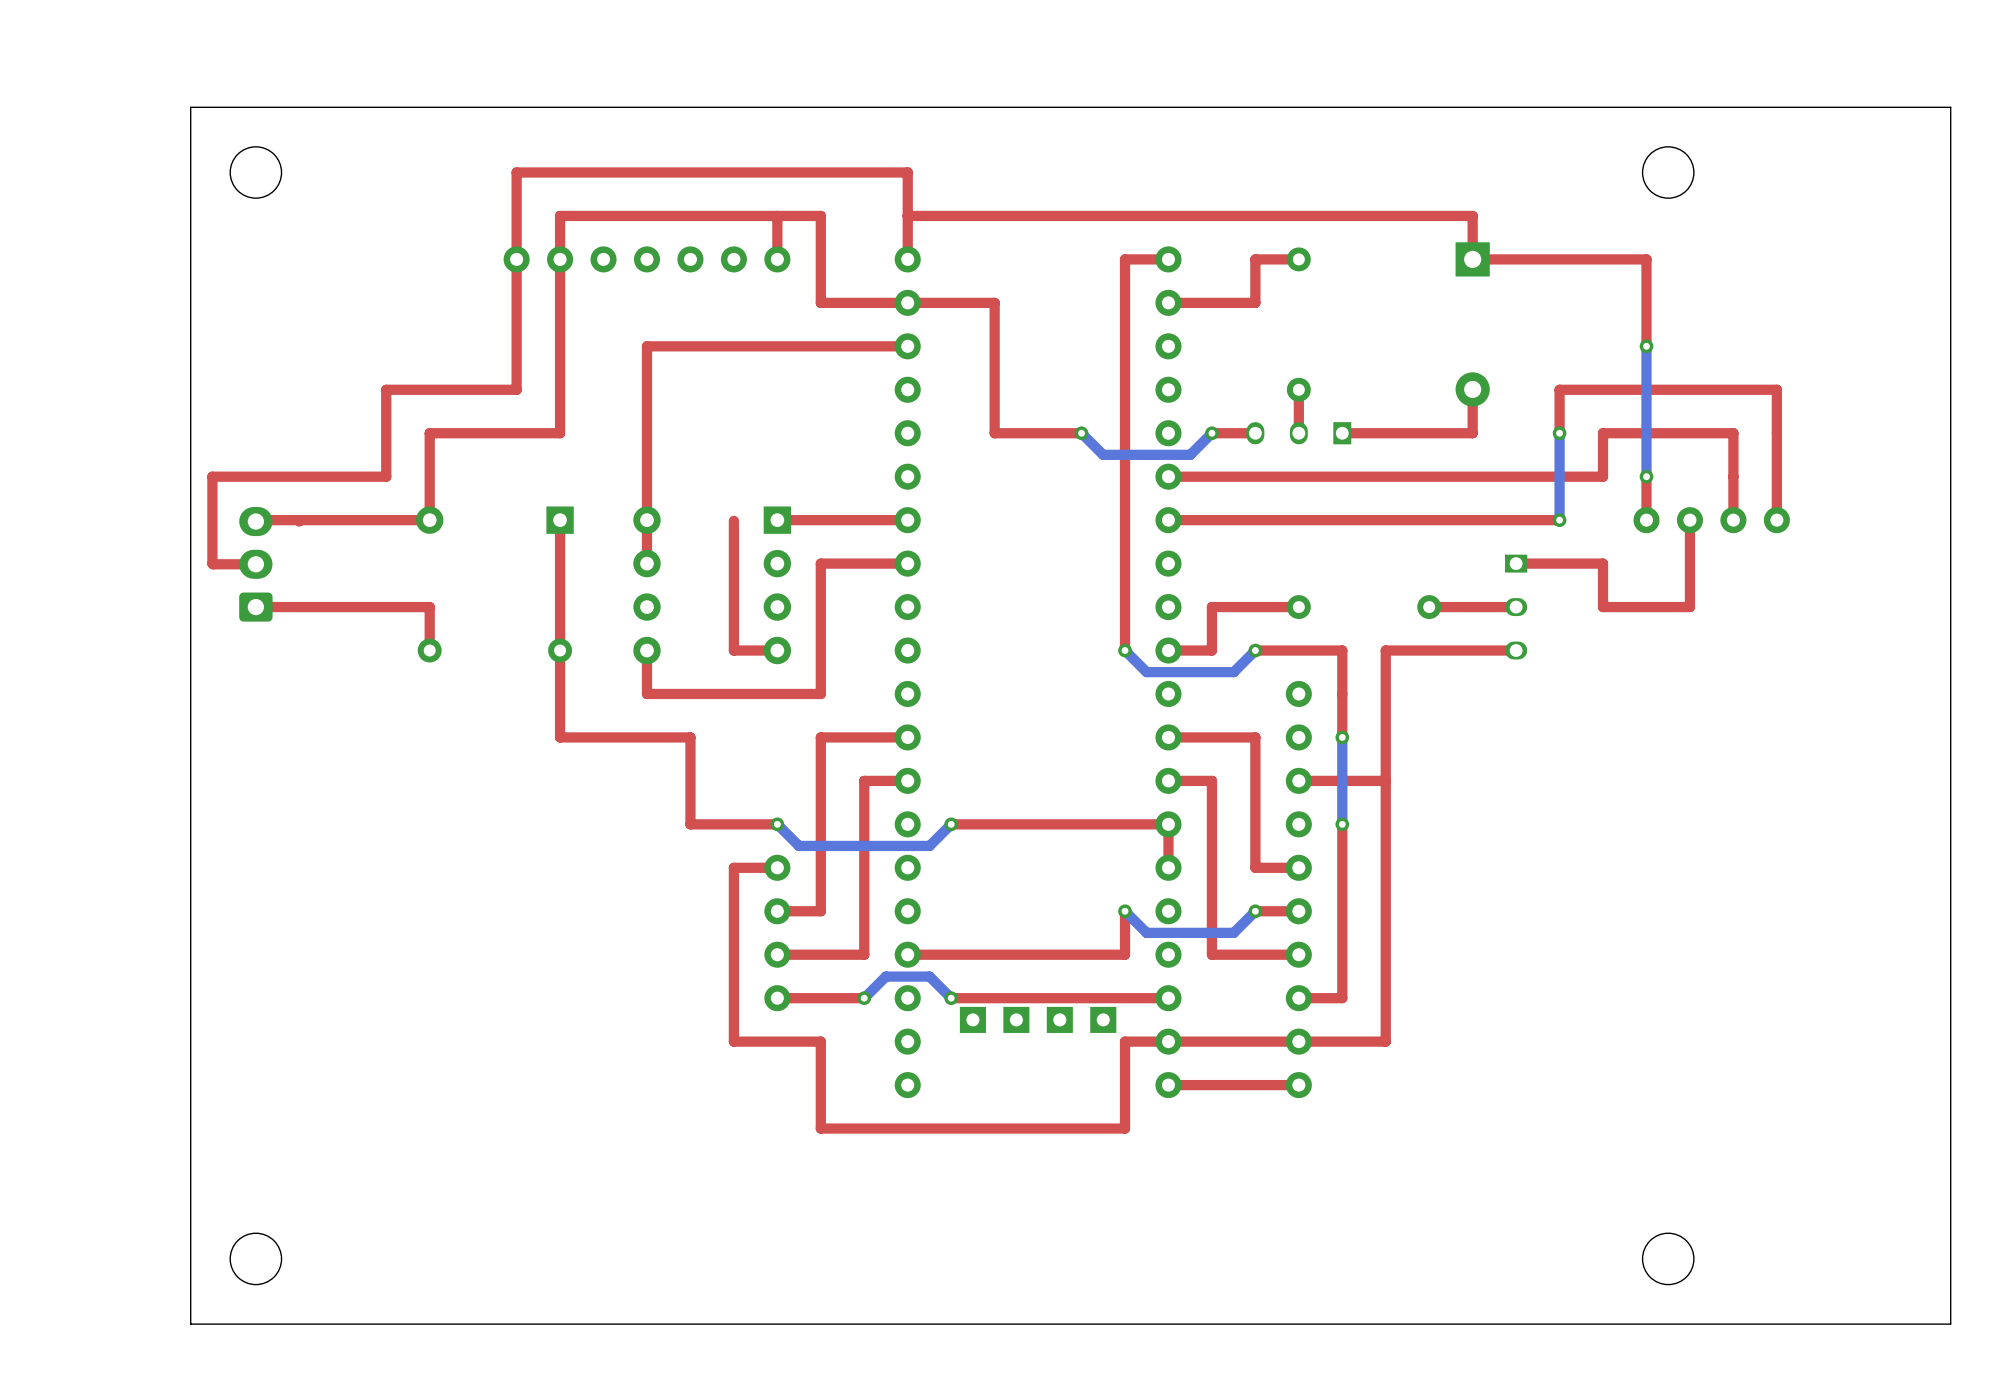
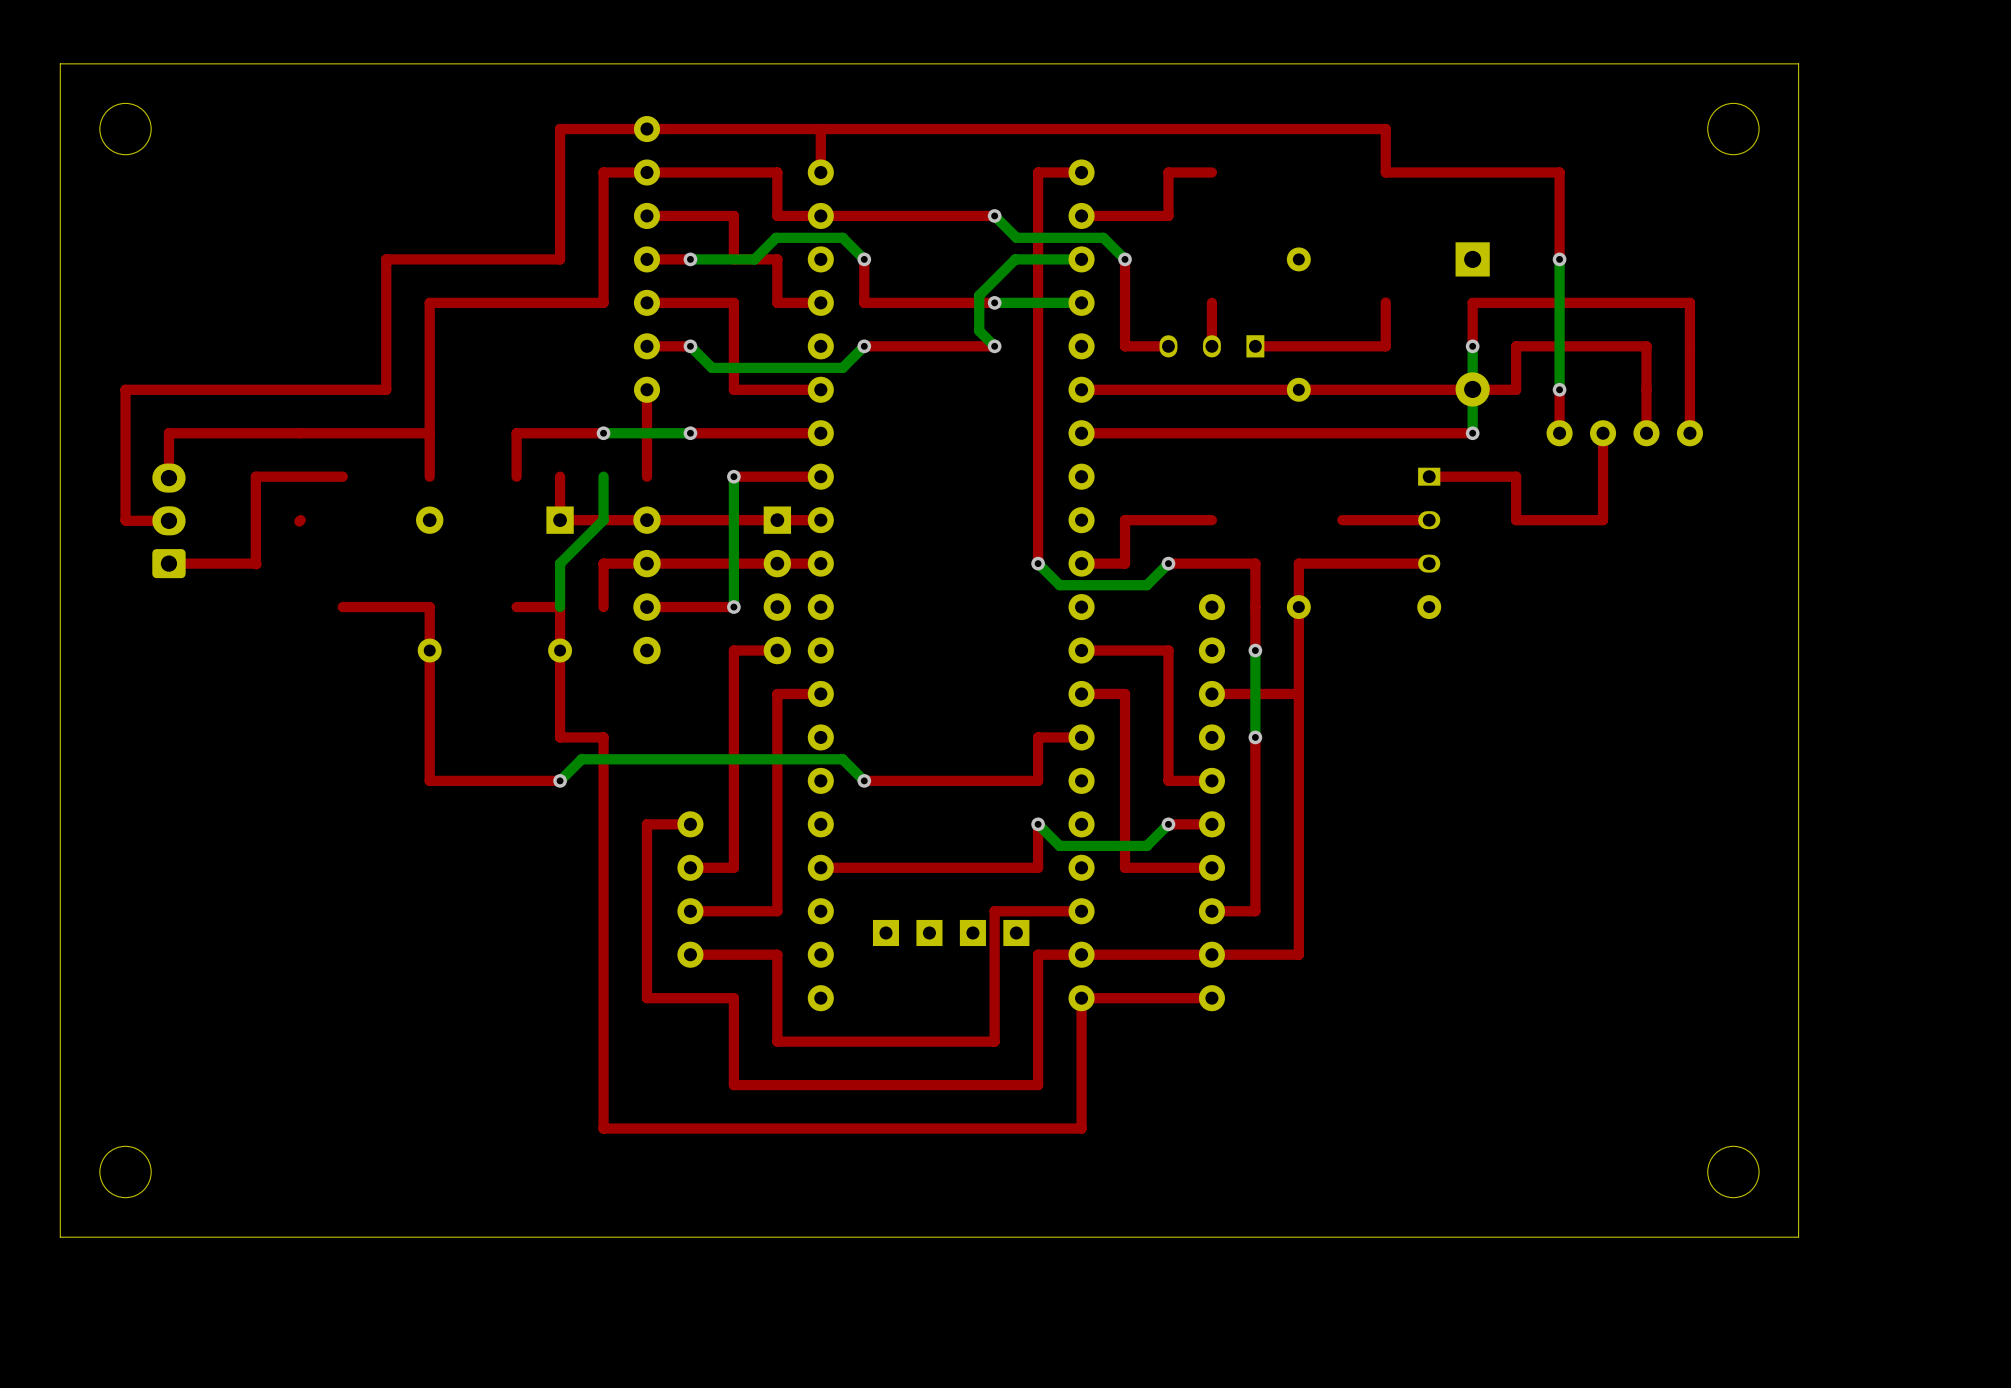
board edge: (1950, 107) (1950, 1324) (190, 1324) (190, 107) (1950, 107) -> (1798, 63) (1798, 1237) (60, 1237) (60, 63) (1798, 63)
round board edge position: (255, 172) -> (125, 129)
top track: (603, 172) (516, 172) (516, 389) (386, 389) (386, 476) (342, 476) -> (603, 172) (603, 302) (429, 302) (429, 433) (168, 433) (168, 478)
top track: (777, 172) (907, 172) (907, 259) -> (777, 172) (777, 215)
top track: none -> (1081, 172) (1038, 172) (1038, 563)
round board edge position: (1668, 172) -> (1733, 129)
top track: (646, 215) (560, 215) -> (1559, 259) (1559, 172) (1385, 172) (1385, 129) (560, 129) (560, 215)
top track: (733, 215) (777, 215) (777, 259) -> (733, 215) (733, 259) (777, 259) (777, 302) (820, 302)
top track: (820, 215) (820, 302) (864, 302) -> (864, 259) (864, 302)
top track: none -> (907, 215) (820, 215)
bottom track: none -> (994, 215) (1016, 237) (1103, 237) (1125, 259)
via: none -> (994, 215)
top track: (1081, 215) (994, 215) -> (994, 346) (907, 346)
top track: (1168, 215) (1472, 215) (1472, 259) (1646, 259) (1646, 346) -> (1168, 215) (1168, 172) (1211, 172)
top track: (560, 259) (560, 433) -> (603, 433) (560, 433)
top track: none -> (560, 259) (386, 259) (386, 389) (125, 389) (125, 520) (168, 520)
part rotation: 0° (646, 259) -> 90° clockwise (646, 259)
top track: none -> (690, 259) (646, 259)
via: none -> (690, 259)
bottom track: none -> (864, 259) (842, 237) (776, 237) (754, 259) (690, 259)
via: none -> (864, 259)
bottom track: none -> (1081, 259) (1015, 259) (979, 295) (979, 330) (994, 346)
via: none -> (1125, 259)
top track: (1168, 259) (1125, 259) -> (1168, 520) (1125, 520)
top track: (1298, 259) (1255, 259) (1255, 302) (1168, 302) -> none
via: none -> (1559, 259)
top track: none -> (646, 302) (733, 302) (733, 389) (820, 389)
top track: (994, 302) (994, 433) (1081, 433) -> (1211, 433) (1081, 433)
via: none -> (994, 302)
bottom track: none -> (1081, 302) (994, 302)
top track: none -> (1385, 302) (1385, 346) (1255, 346)
top track: (646, 346) (646, 389) -> (820, 129) (820, 172)
via: none -> (690, 346)
top track: (864, 346) (690, 346) -> none
bottom track: none -> (864, 346) (842, 367) (712, 367) (690, 346)
via: none -> (864, 346)
via: none -> (994, 346)
top track: (1125, 346) (1125, 520) -> (1125, 346) (1168, 346)
part: none -> (1211, 346)
top track: none -> (1472, 346) (1472, 302) (1689, 302) (1689, 433)
via: none -> (1472, 346)
bottom track: (1646, 346) (1646, 476) -> (1559, 259) (1559, 389)
via: (1646, 346) -> none
top track: none -> (1081, 389) (1516, 389) (1516, 346) (1646, 346) (1646, 433)
top track: (1298, 389) (1298, 433) -> (1211, 302) (1211, 346)
top track: (1472, 389) (1472, 433) -> none
top track: (1559, 389) (1776, 389) (1776, 520) -> none
via: none -> (1559, 389)
top track: (516, 433) (429, 433) -> (516, 433) (516, 476)
via: none -> (603, 433)
bottom track: none -> (690, 433) (603, 433)
via: none -> (690, 433)
top track: none -> (820, 433) (690, 433)
via: (1081, 433) -> none
bottom track: (1211, 433) (1190, 454) (1103, 454) (1081, 433) -> (1168, 563) (1146, 585) (1059, 585) (1038, 563)
via: (1211, 433) -> none
part: (1298, 433) -> none
via: none -> (1472, 433)
bottom track: (1559, 433) (1559, 520) -> (1472, 346) (1472, 433)
via: (1559, 433) -> none
top track: (1603, 433) (1733, 433) (1733, 520) -> none
top track: (255, 476) (212, 476) (212, 563) (255, 564) -> (255, 476) (255, 563) (168, 563)
top track: (429, 476) (429, 520) (255, 521) -> none
top track: none -> (560, 476) (560, 520) (777, 520)
bottom track: none -> (603, 476) (603, 520) (560, 563) (560, 607)
top track: (646, 476) (646, 563) -> none
bottom track: none -> (733, 476) (733, 607)
via: none -> (733, 476)
top track: (1429, 476) (1168, 476) -> none
top track: (1603, 476) (1516, 476) -> (1603, 476) (1603, 520) (1559, 520)
top track: (1646, 476) (1646, 520) -> none
via: (1646, 476) -> none
top track: (560, 520) (560, 607) -> (516, 607) (560, 607)
top track: (733, 520) (733, 650) -> (690, 867) (733, 867) (733, 650)
top track: (907, 520) (820, 520) -> (820, 476) (733, 476)
top track: (1342, 520) (1211, 520) -> none
part: none -> (1429, 520)
top track: (1516, 520) (1429, 520) -> (1516, 520) (1516, 476)
via: (1559, 520) -> none
top track: (1689, 520) (1689, 607) (1603, 607) (1603, 563) (1516, 563) -> none
part position: (1711, 520) -> (1624, 433)
top track: none -> (820, 563) (603, 563) (603, 607)
top track: (907, 563) (820, 563) (820, 693) -> none
via: none -> (1038, 563)
top track: (1125, 563) (1125, 650) -> (1125, 563) (1081, 563)
via: none -> (1168, 563)
top track: none -> (1429, 563) (1298, 563) (1298, 954)
part position: (255, 564) -> (168, 520)
top track: (342, 607) (255, 607) -> none
via: none -> (733, 607)
top track: (1298, 607) (1211, 607) (1211, 650) (1168, 650) -> none
top track: (1516, 607) (1429, 607) -> (1342, 433) (1255, 433)
part: (1516, 607) -> none
top track: none -> (429, 650) (429, 780) (560, 780)
top track: (646, 650) (646, 693) (777, 693) -> (690, 911) (777, 911) (777, 693)
top track: none -> (1081, 650) (1168, 650) (1168, 780)
via: (1125, 650) -> none
top track: (1255, 650) (1342, 650) (1342, 737) -> (1255, 650) (1255, 563) (1168, 563)
bottom track: (1255, 650) (1233, 672) (1146, 672) (1125, 650) -> (1255, 650) (1255, 737)
top track: (1516, 650) (1385, 650) (1385, 1041) (1125, 1041) (1125, 1128) (1081, 1128) -> none
part position: (1038, 672) -> (951, 585)
top track: none -> (1081, 693) (1125, 693) (1125, 867) (1211, 867)
top track: (603, 737) (690, 737) (690, 824) (777, 824) -> (603, 737) (603, 1128) (820, 1128)
top track: (907, 737) (820, 737) (820, 911) (777, 911) -> none
top track: none -> (1081, 737) (1038, 737) (1038, 780) (907, 780)
top track: (1255, 737) (1168, 737) -> none
via: none -> (1255, 737)
bottom track: (1342, 737) (1342, 824) -> none
via: (1342, 737) -> none
via: none -> (560, 780)
top track: (864, 780) (864, 954) (777, 954) -> none
bottom track: none -> (864, 780) (842, 759) (581, 759) (560, 780)
via: none -> (864, 780)
top track: (1211, 780) (1211, 954) -> none
top track: (1385, 780) (1298, 780) -> (1298, 693) (1211, 693)
via: (777, 824) -> none
top track: (951, 824) (1168, 824) (1168, 867) -> none
bottom track: (951, 824) (929, 845) (798, 845) (777, 824) -> none
via: (951, 824) -> none
top track: none -> (1038, 824) (1038, 867) (820, 867)
via: none -> (1038, 824)
via: none -> (1168, 824)
top track: (1342, 824) (1342, 998) (1298, 998) -> none
via: (1342, 824) -> none
top track: (777, 867) (733, 867) (733, 998) -> (690, 824) (646, 824) (646, 998) (733, 998)
top track: (1298, 867) (1255, 867) -> (1211, 911) (1255, 911) (1255, 867)
part position: (1298, 889) -> (1211, 802)
top track: (1125, 911) (1125, 954) -> (1211, 954) (1125, 954)
via: (1125, 911) -> none
bottom track: (1255, 911) (1233, 932) (1146, 932) (1125, 911) -> (1168, 824) (1146, 845) (1059, 845) (1038, 824)
via: (1255, 911) -> none
top track: (1298, 911) (1255, 911) -> (1211, 824) (1168, 824)
part position: (777, 932) -> (690, 889)
top track: (1038, 954) (907, 954) -> (1038, 954) (1038, 1085) (733, 1085) (733, 1041)
top track: (864, 998) (777, 998) -> (733, 607) (646, 607)
via: (864, 998) -> none
bottom track: (951, 998) (929, 976) (885, 976) (864, 998) -> none
via: (951, 998) -> none
top track: (1081, 998) (951, 998) -> (1081, 998) (1081, 1128)
top track: none -> (1211, 998) (1168, 998)
top track: (777, 1041) (733, 1041) -> (777, 1041) (777, 954) (690, 954)
top track: (820, 1041) (820, 1128) -> (820, 1041) (994, 1041) (994, 911) (1081, 911)
top track: (1298, 1085) (1168, 1085) -> none
round board edge position: (255, 1258) -> (125, 1172)
round board edge position: (1668, 1258) -> (1733, 1172)

